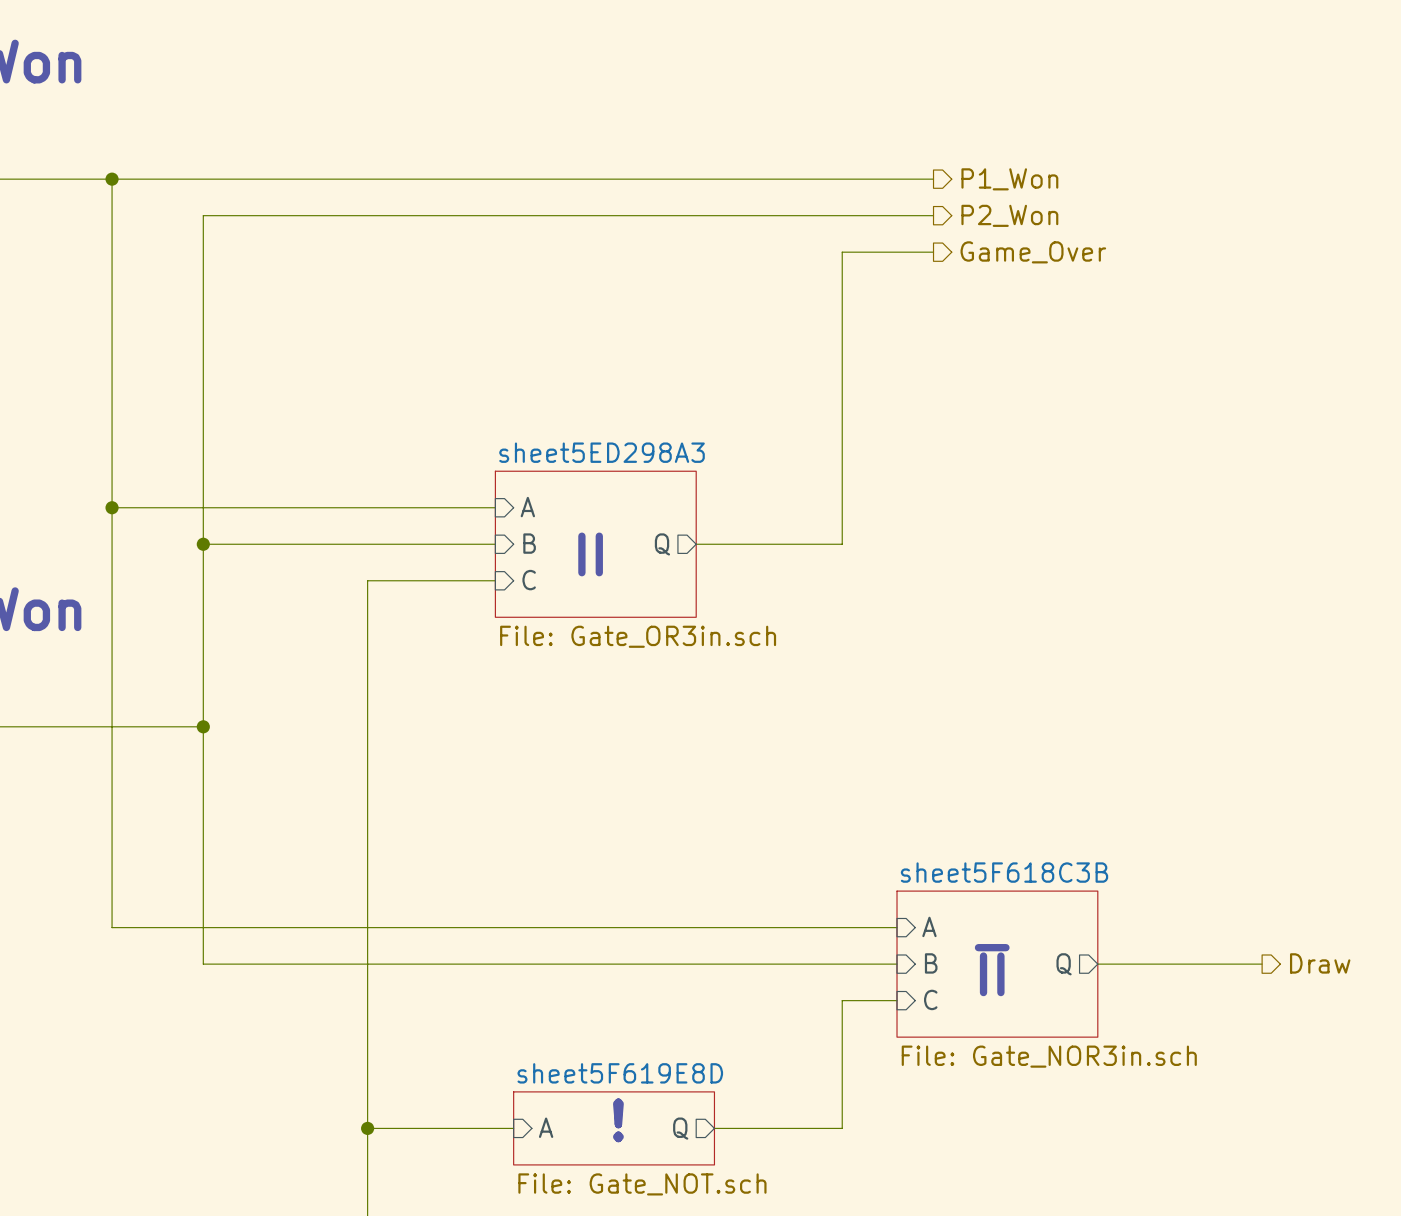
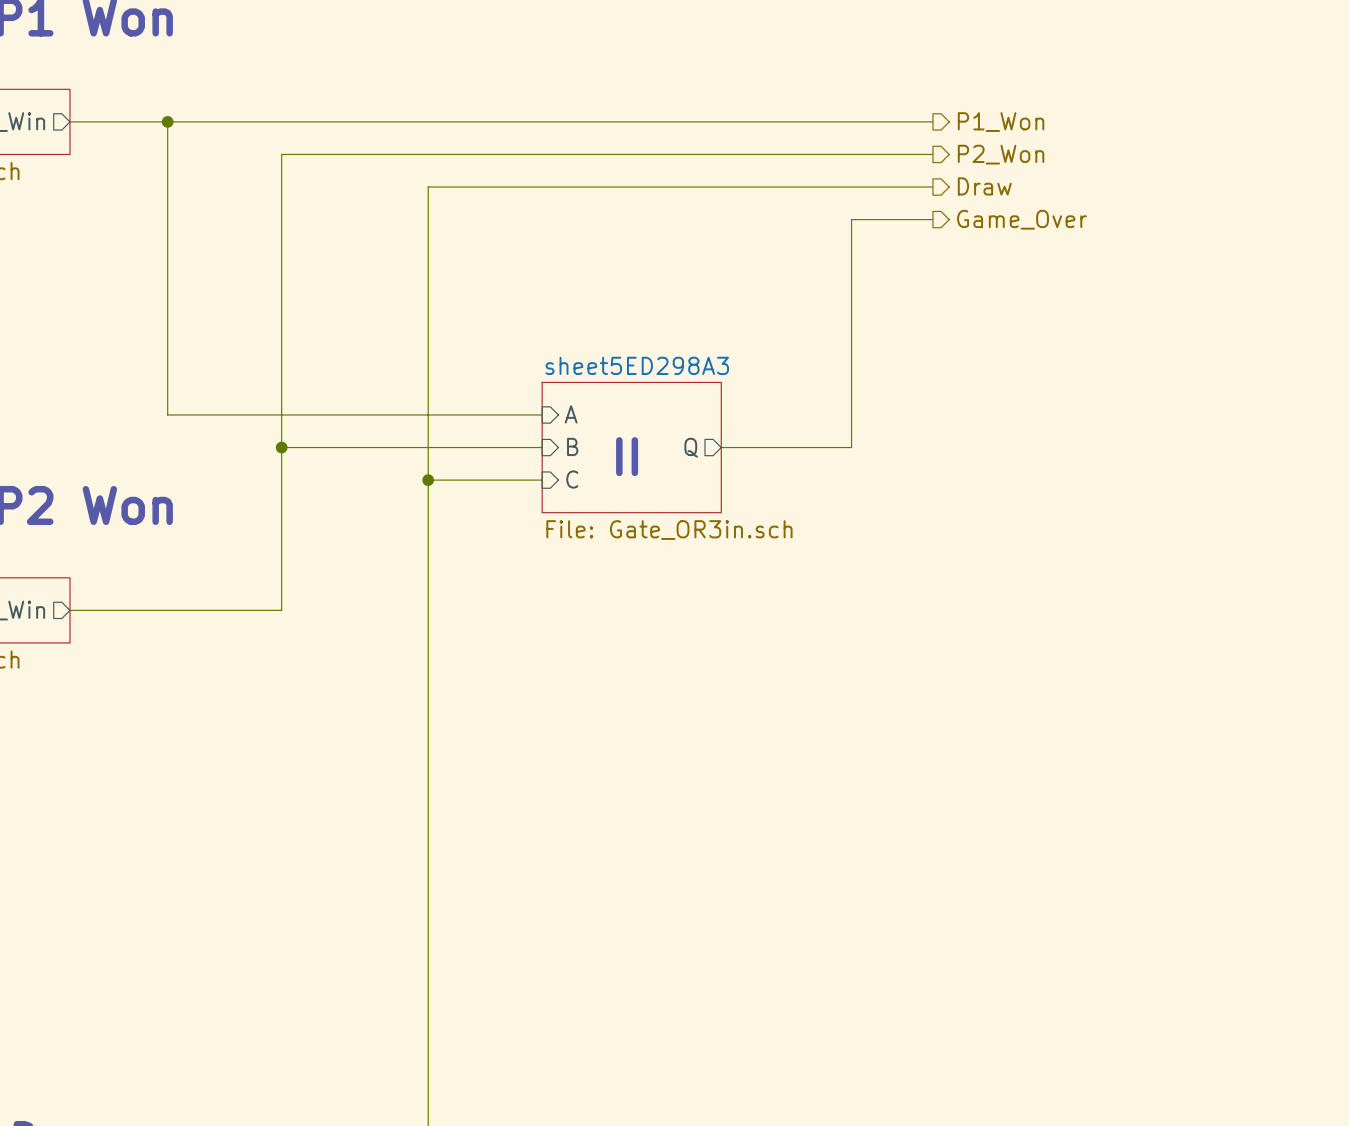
wire: none -> (167, 121) (167, 414) (200, 414)
wire: (112, 179) (112, 927) (897, 927) -> none
junction position: (112, 179) -> (167, 121)
wire: (842, 252) (842, 288) -> (932, 219) (851, 219)
wire: none -> (851, 187) (428, 187) (428, 480)
hierarchical label: Game_Over (1033, 252) -> Draw (984, 186)
hierarchical label: none -> Game_Over (1021, 219)
junction: (112, 507) -> none
junction: none -> (428, 480)
wire: (203, 726) (203, 964) (897, 964) -> none
junction: (203, 726) -> none
sheet pin: A (929, 926) -> none
sheet pin: B (931, 963) -> none
hierarchical label: Draw (1320, 963) -> none
sheet sheet5F618C3B: File: Gate_NOR3in.sch (997, 964) -> none
sheet pin: Q (1064, 964) -> none
wire: (1097, 964) (1262, 964) -> none
text: ~{II} (992, 970) -> none
sheet pin: C (930, 999) -> none
wire: (897, 1000) (842, 1000) (842, 1128) (714, 1128) -> none
text: ! (618, 1120) -> none
sheet pin: A (546, 1127) -> none
wire: (367, 1128) (513, 1128) -> none
junction: (367, 1128) -> none
sheet sheet5F619E8D: File: Gate_NOT.sch (614, 1128) -> none
sheet pin: Q (680, 1128) -> none

